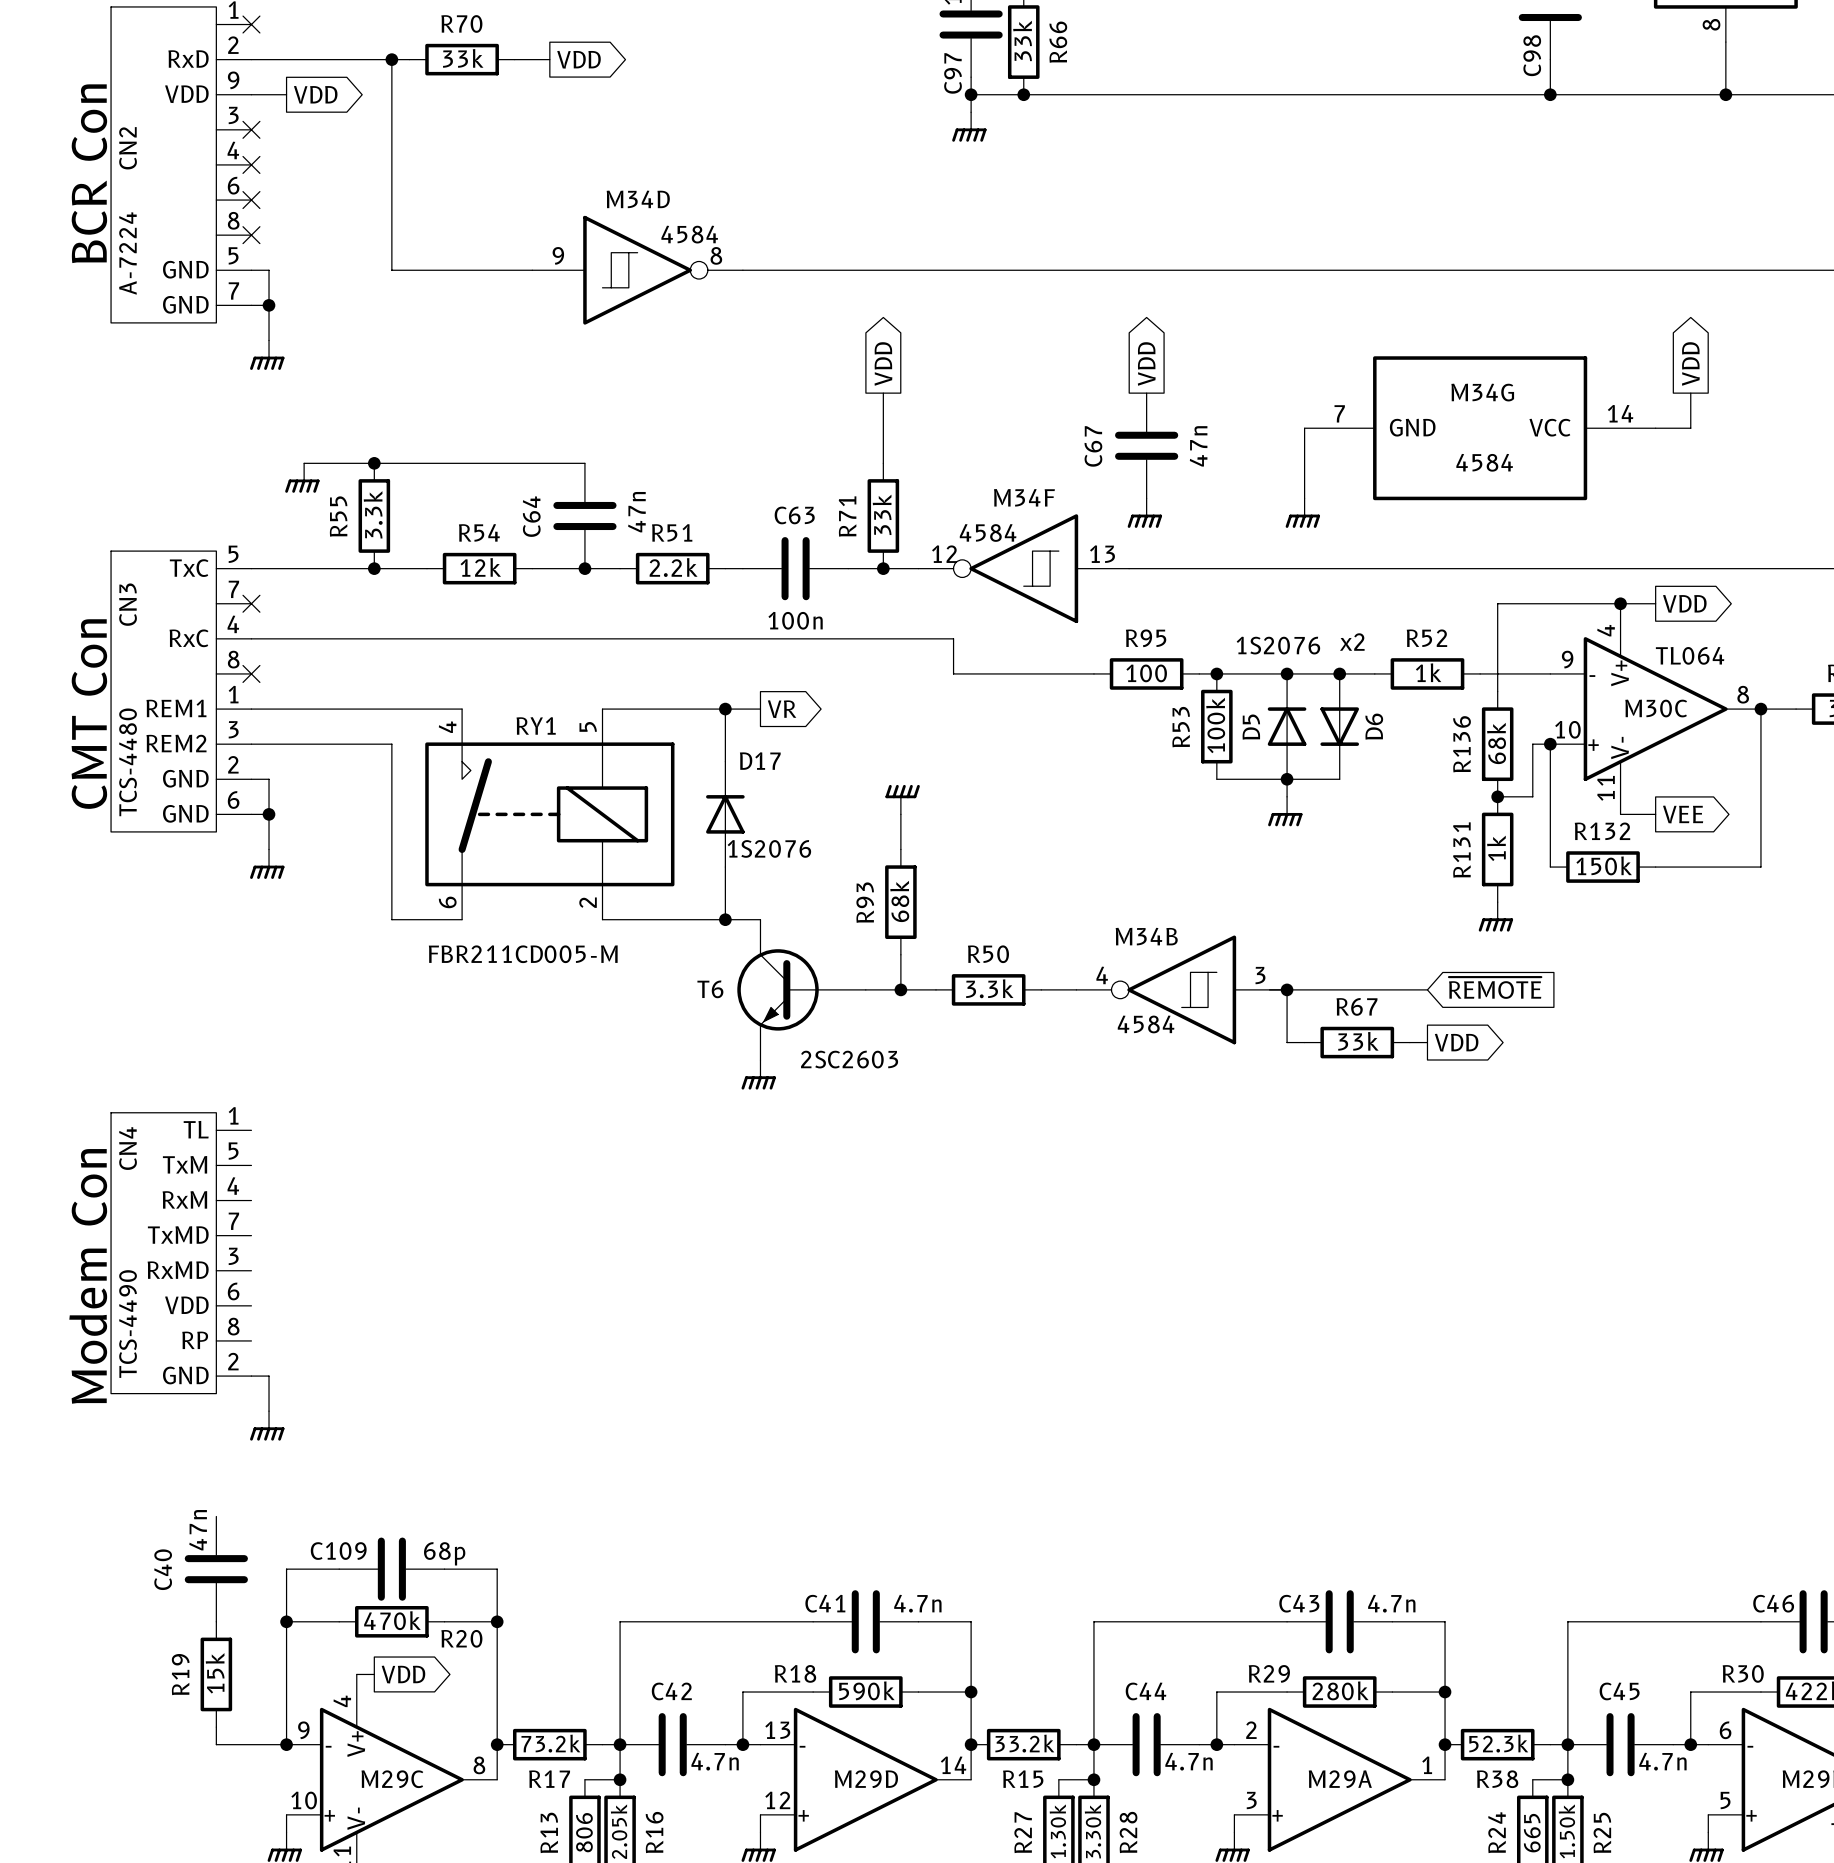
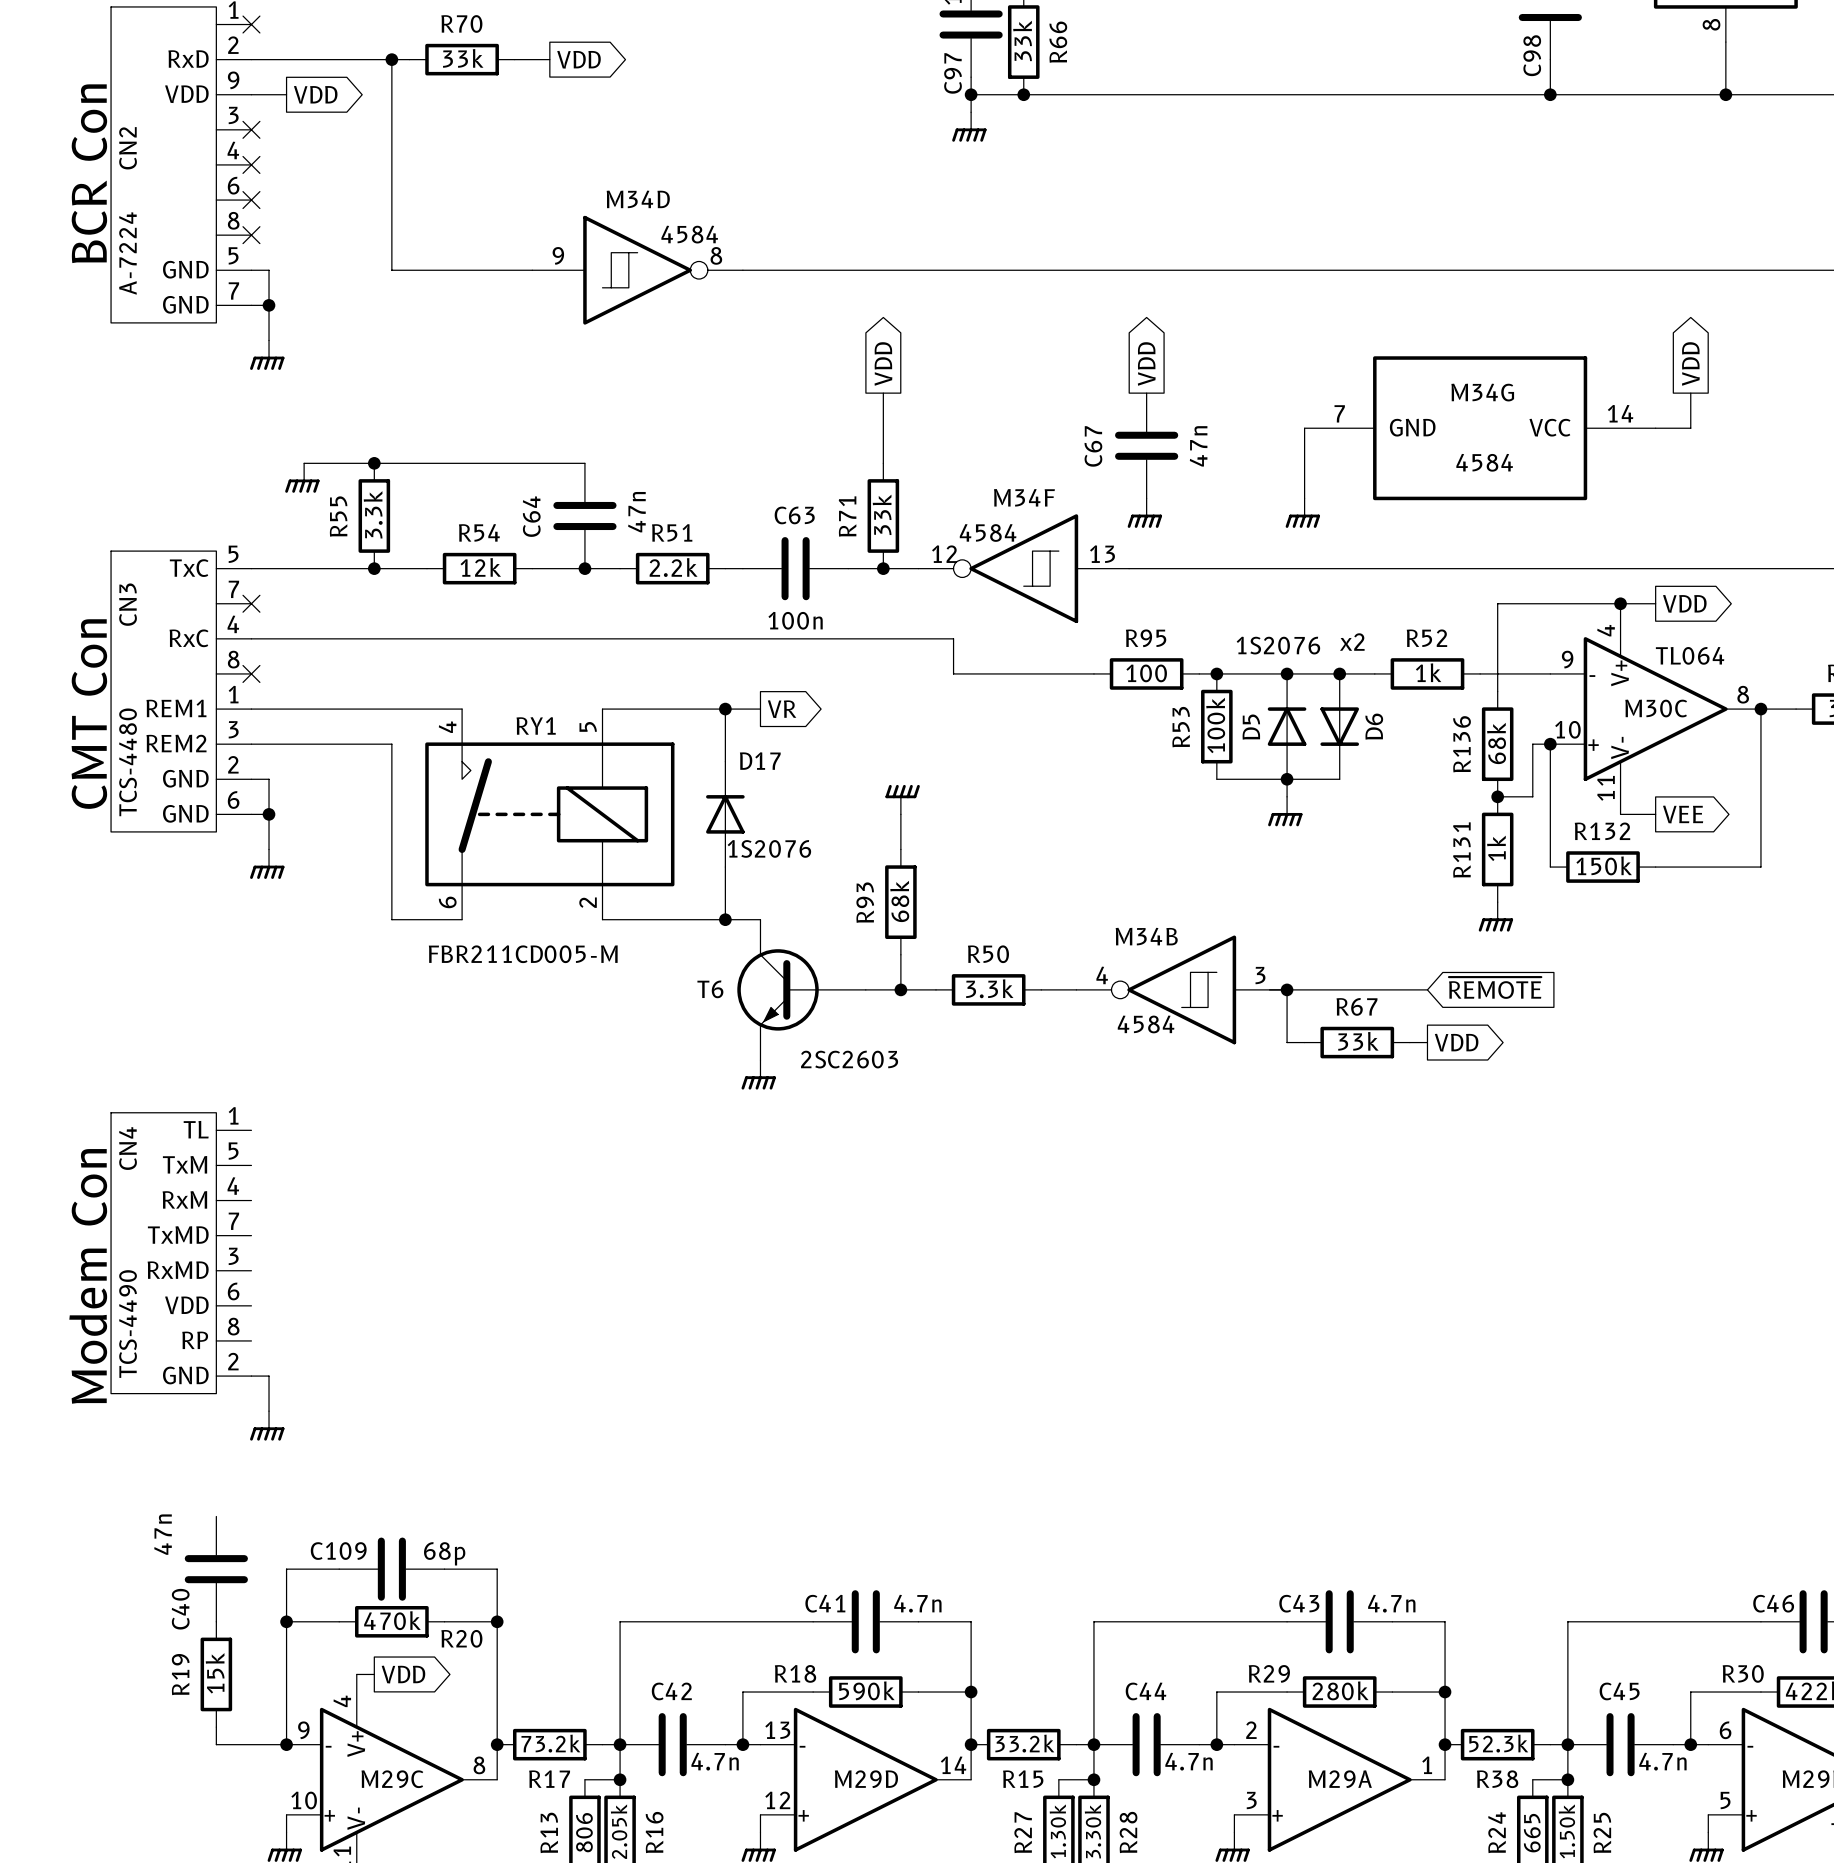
C40 value position: 47n (198, 1530) -> 47n (163, 1534)
C40 name position: C40 (163, 1569) -> C40 (180, 1609)

